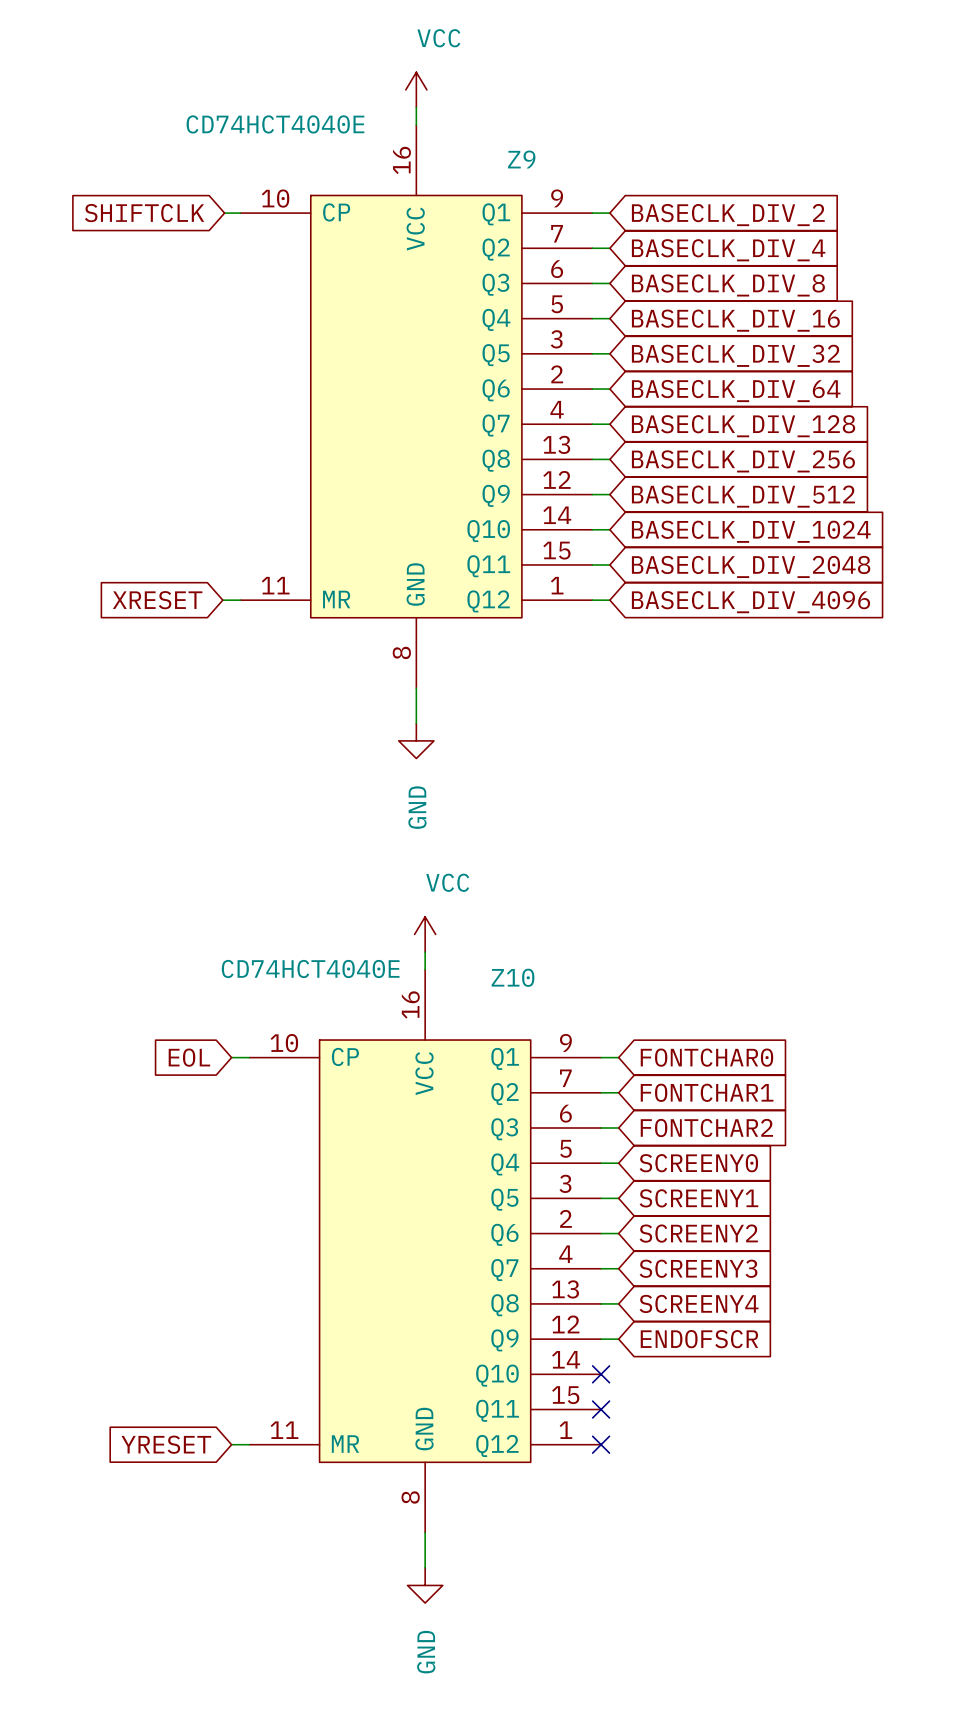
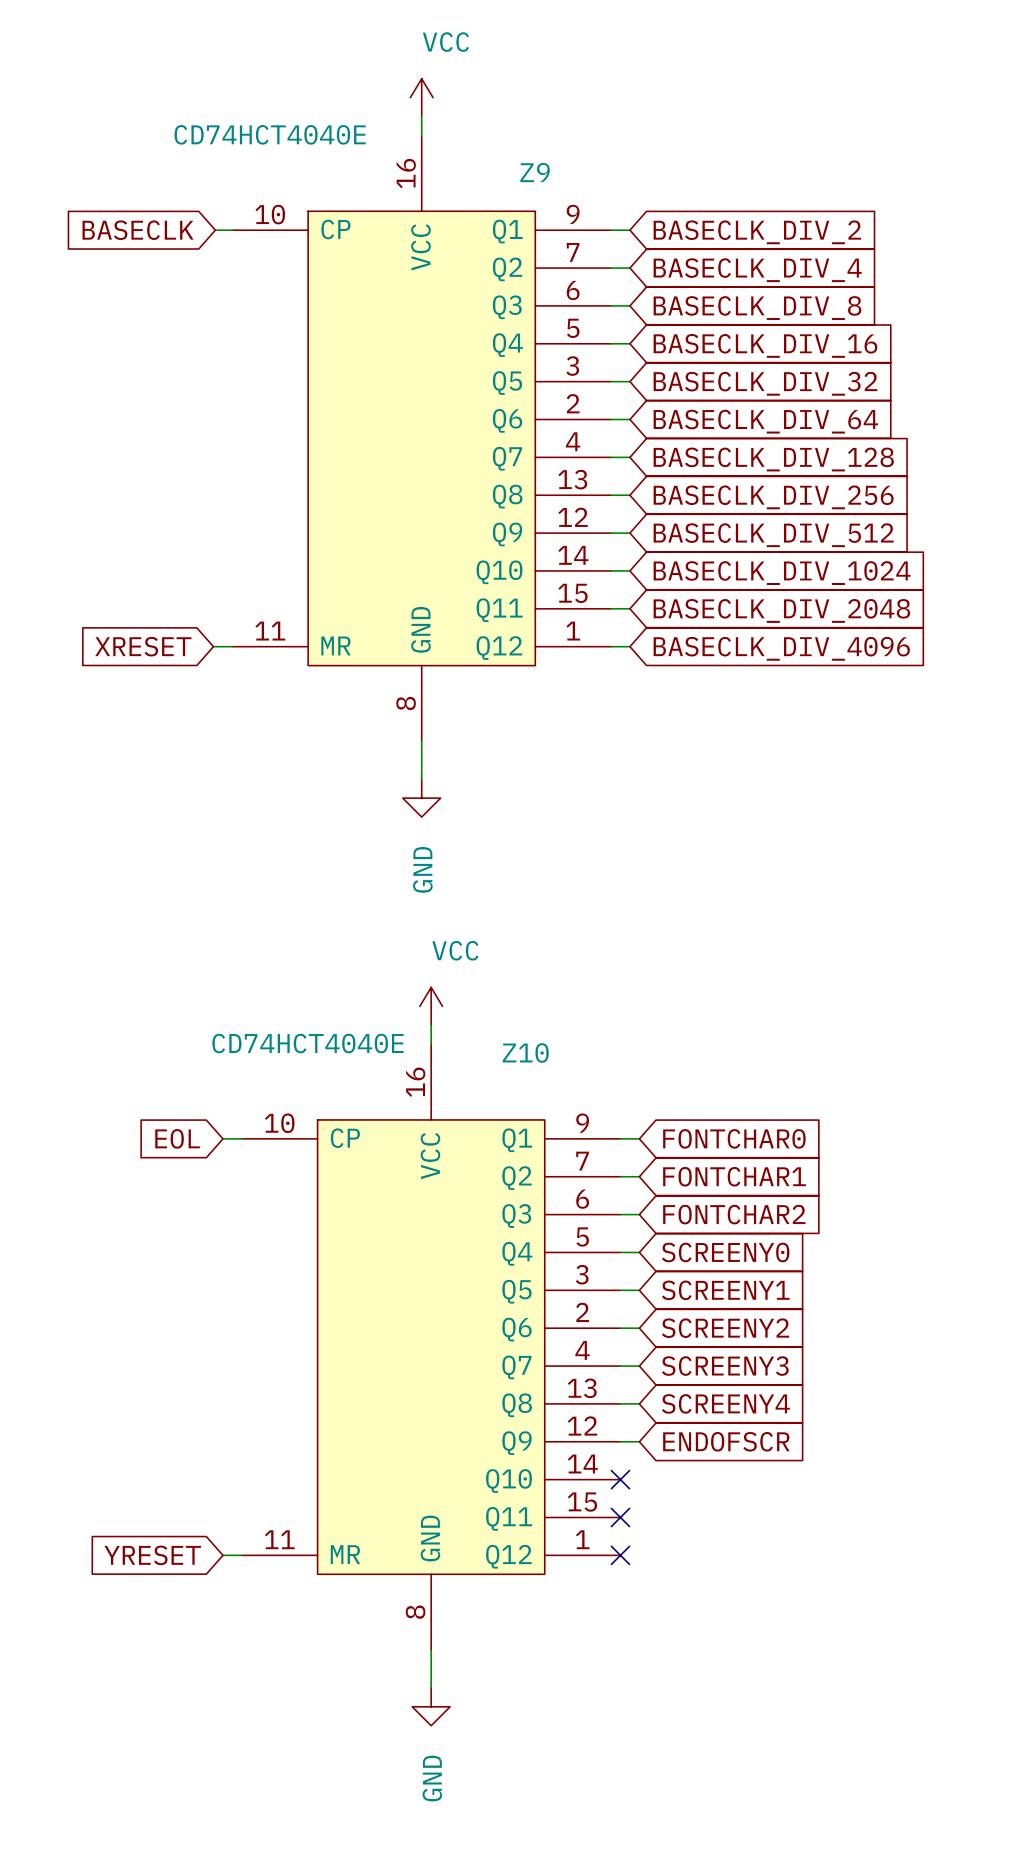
global label: SHIFTCLK (144, 213) -> BASECLK (138, 230)

